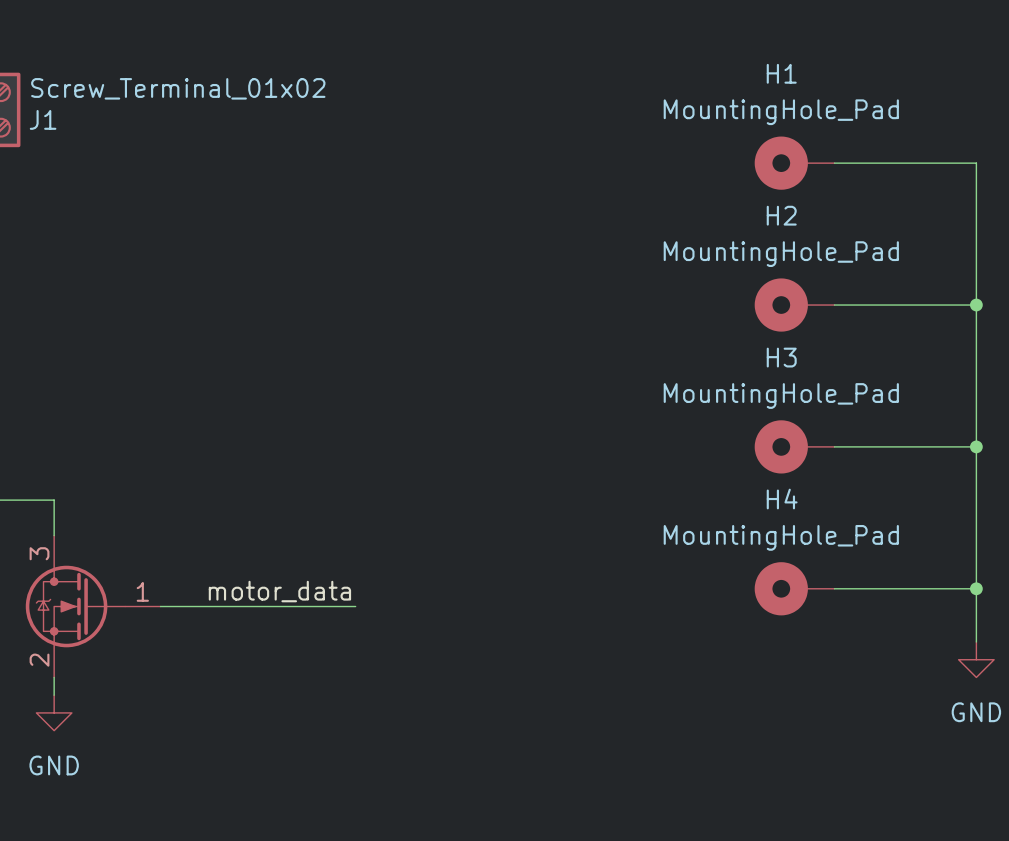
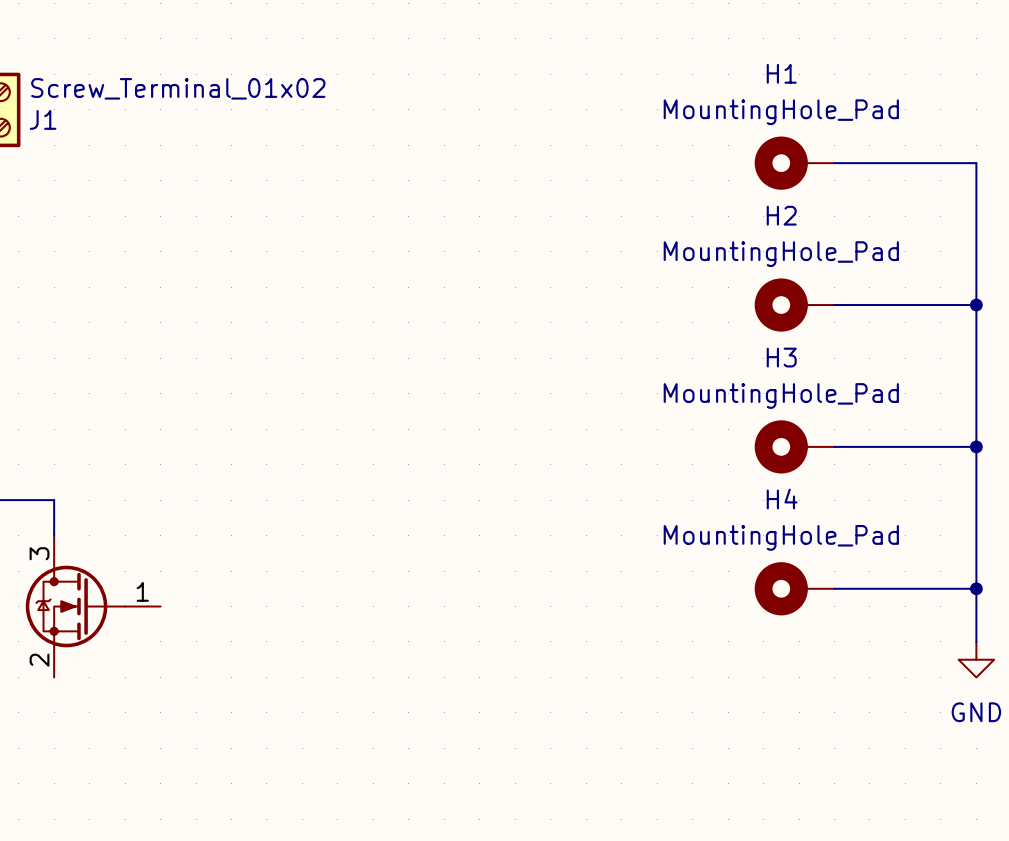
label: motor_data (279, 591) -> none
wire: (160, 606) (355, 606) -> none
wire: (54, 677) (54, 695) -> none
power symbol: GND (54, 712) -> none

